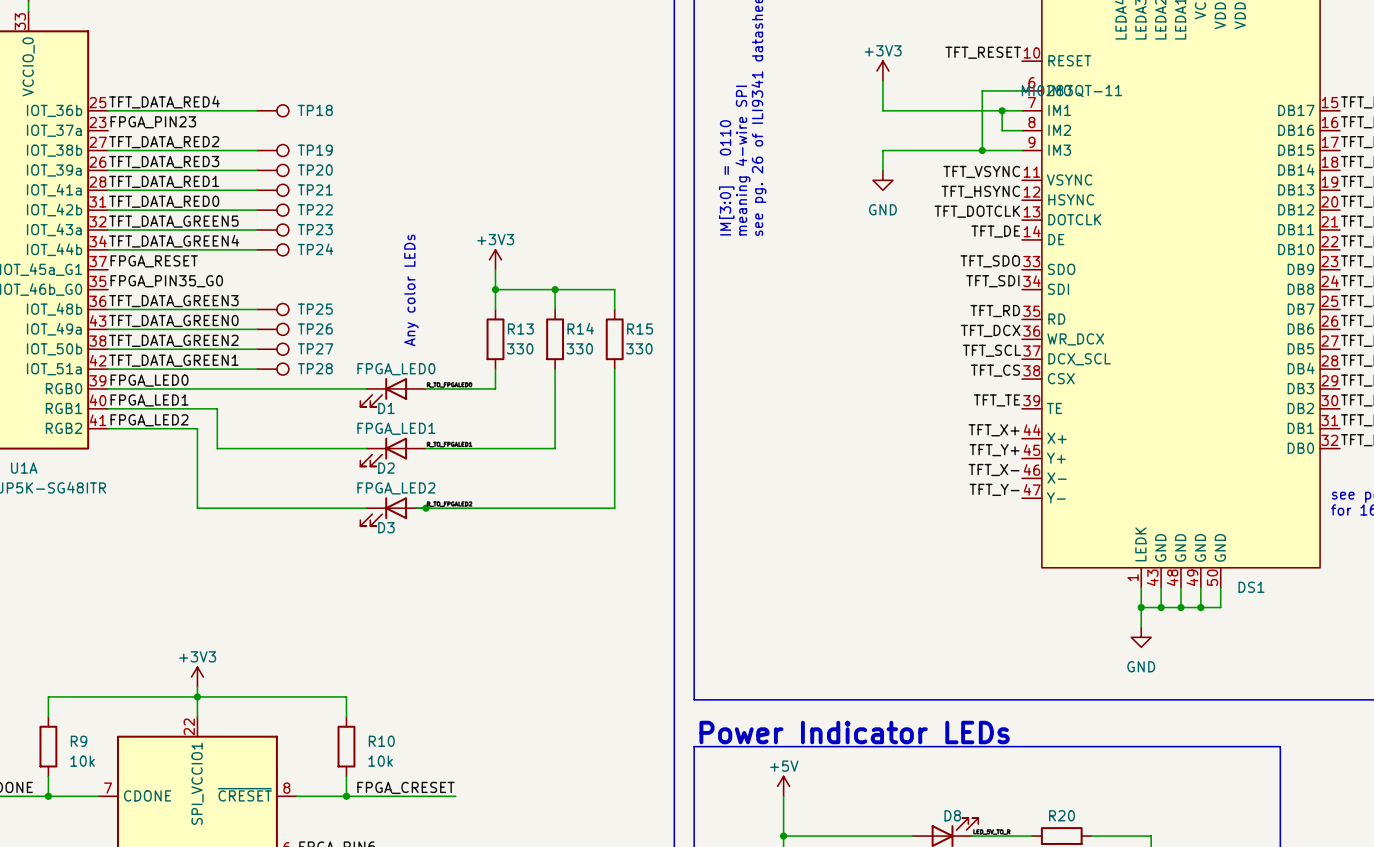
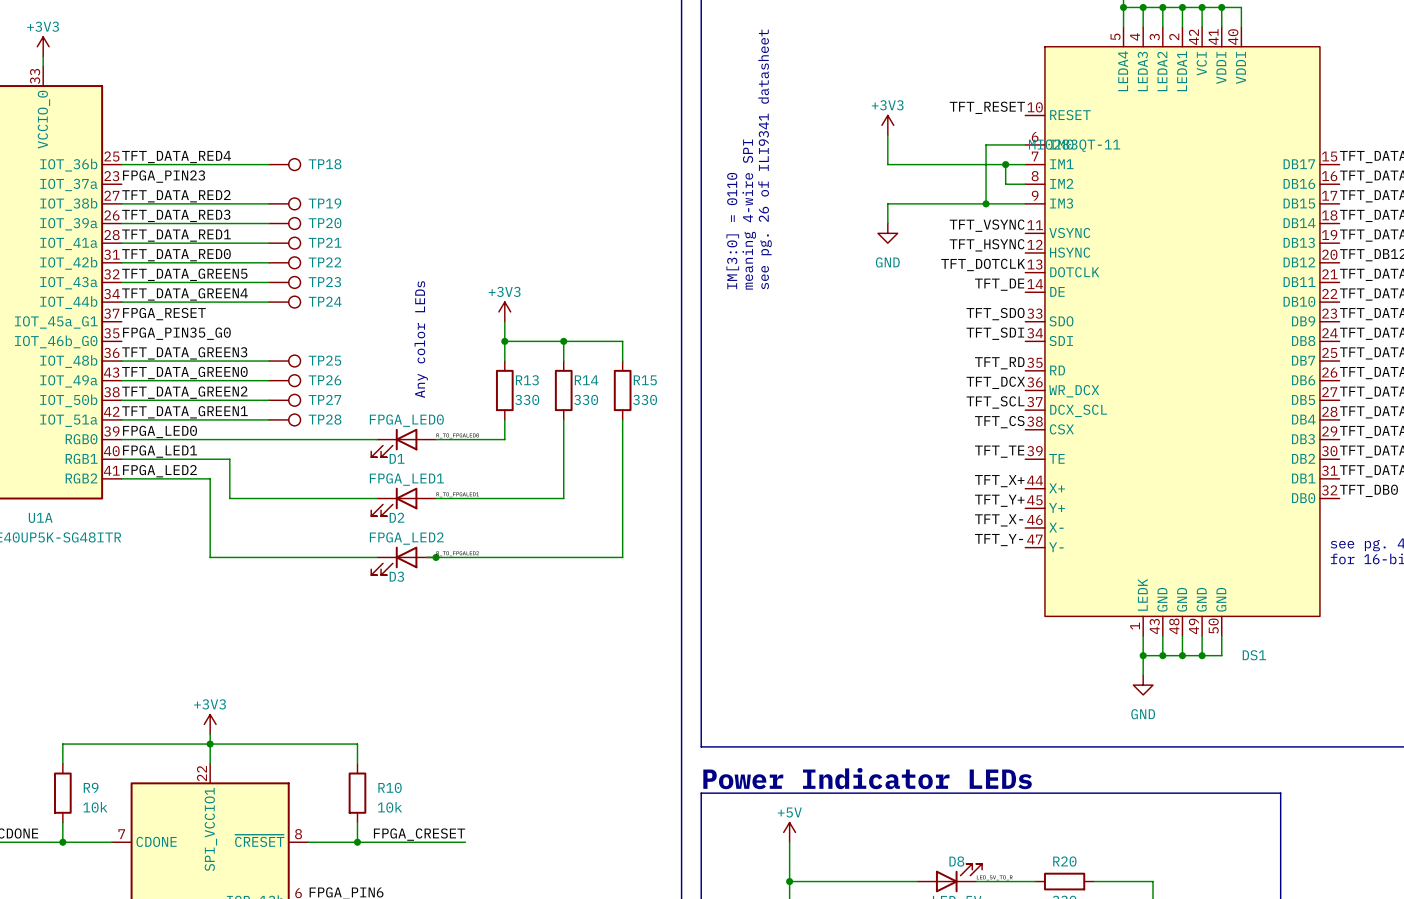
DS1 name position: DS1 (1251, 587) -> DS1 (1254, 655)

